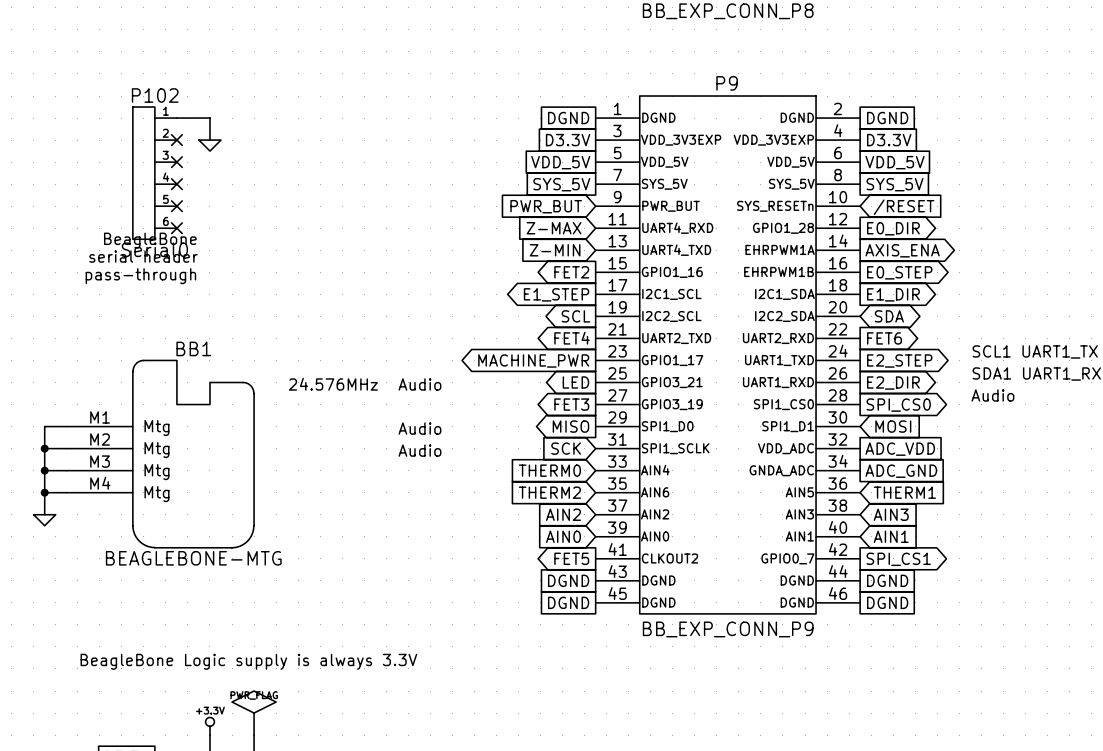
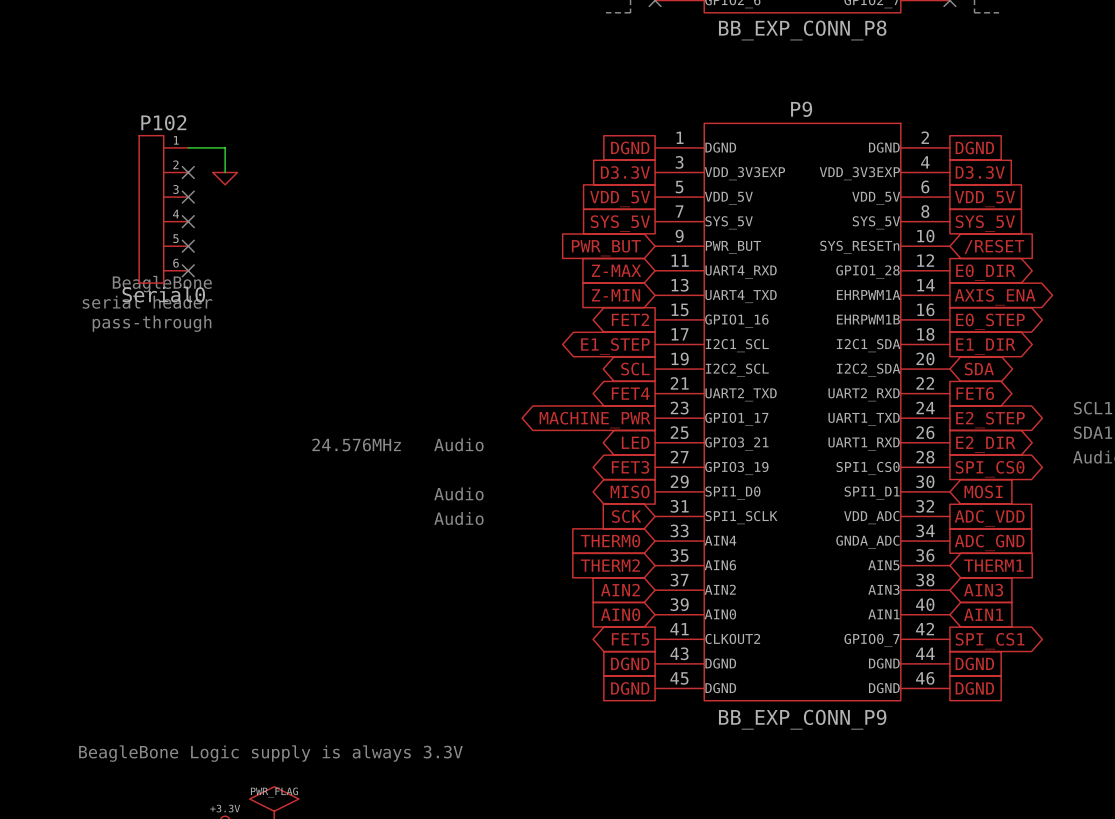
wire: (66, 426) (44, 426) (44, 514) -> none
wire: (44, 448) (66, 448) -> none
junction: (44, 448) -> none
BB1: BEAGLEBONE-MTG (160, 454) -> none
wire: (44, 470) (66, 470) -> none
junction: (44, 470) -> none
wire: (44, 492) (66, 492) -> none
junction: (44, 492) -> none
power symbol: (44, 520) -> none

